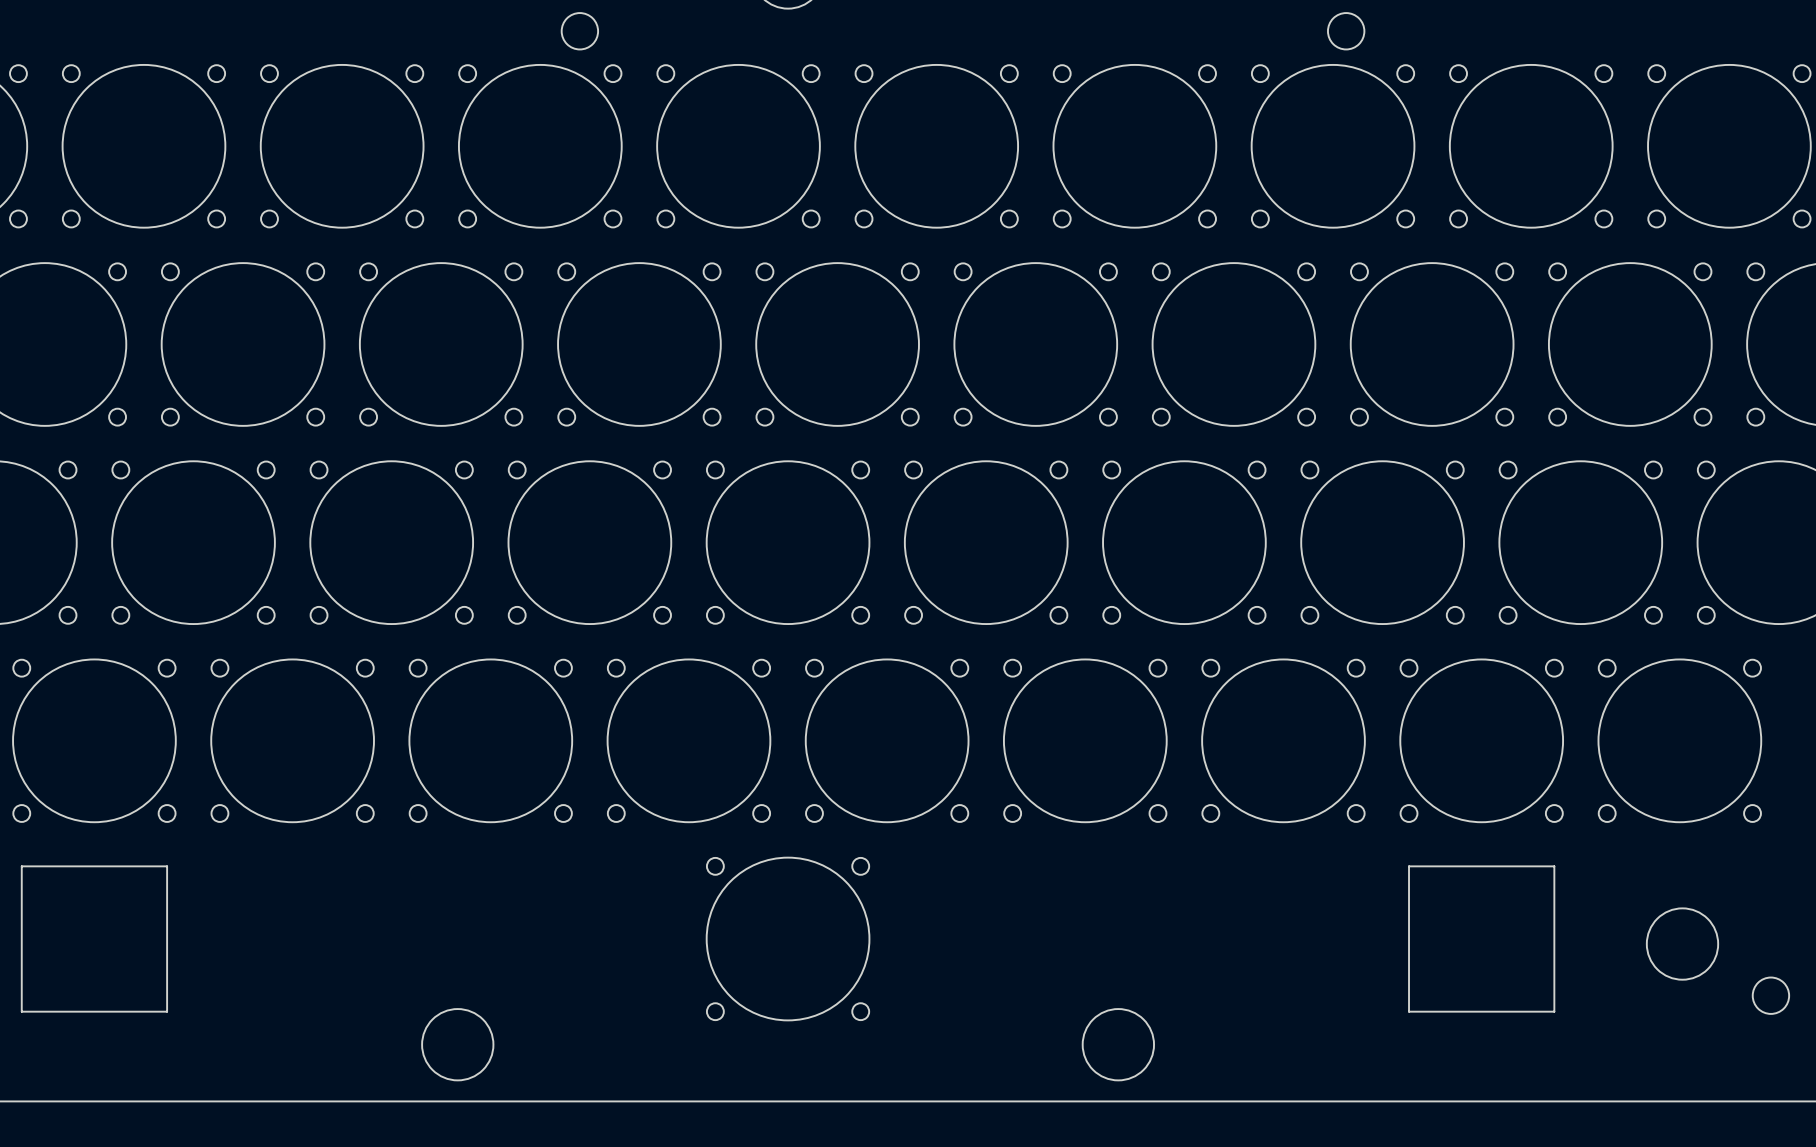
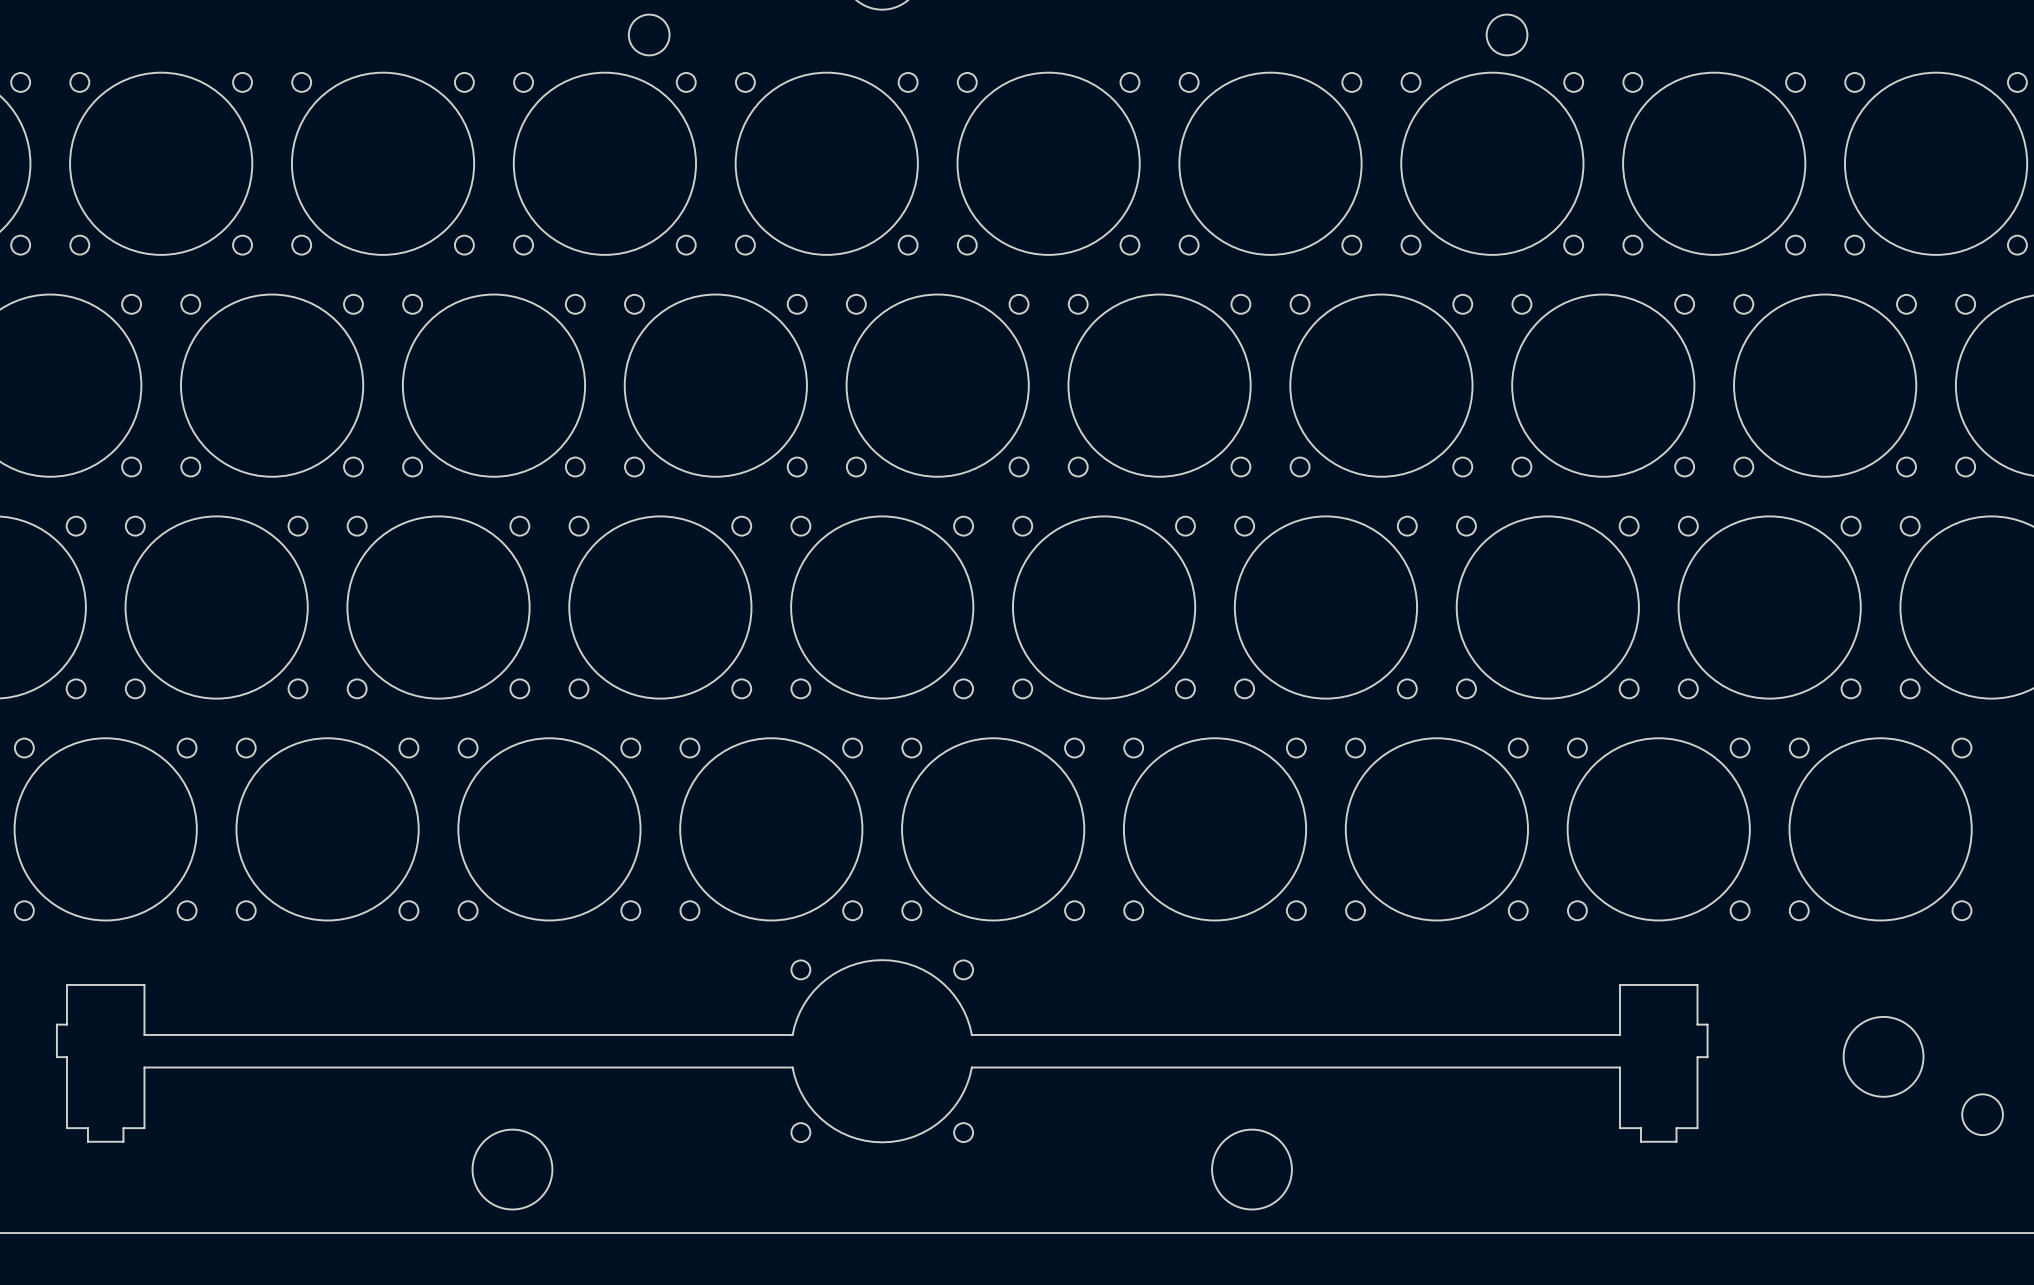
part footprint: [706, 857, 871, 1022] -> [56, 959, 1709, 1144]
drawing: [21, 865, 168, 1013] -> none
drawing: [1408, 865, 1555, 1013] -> none

